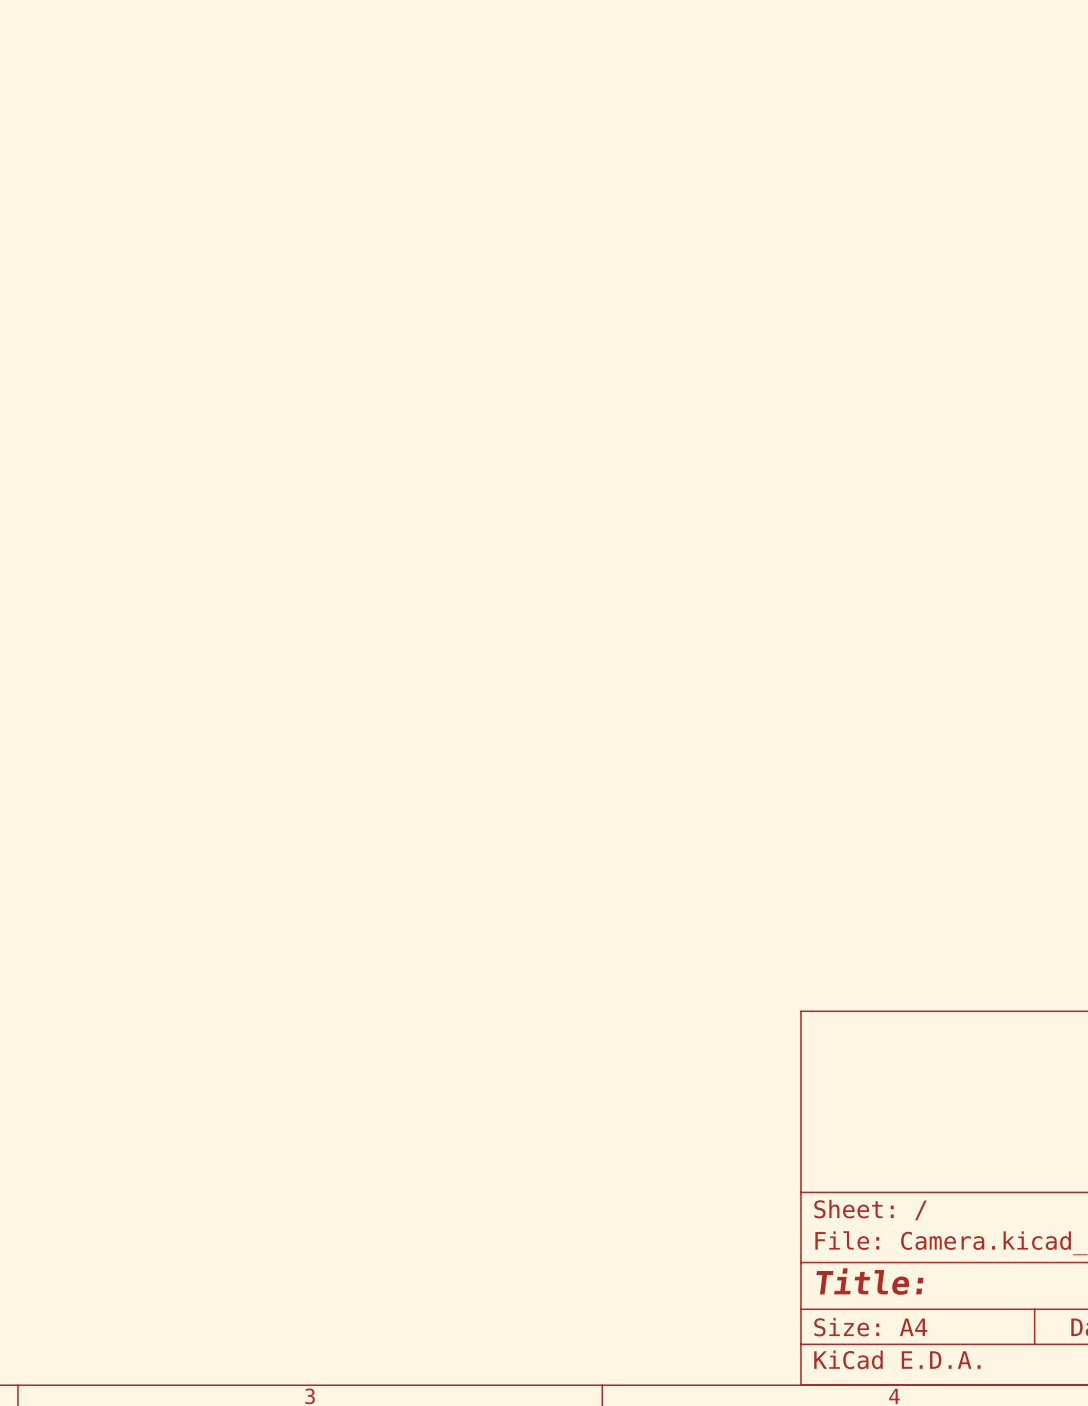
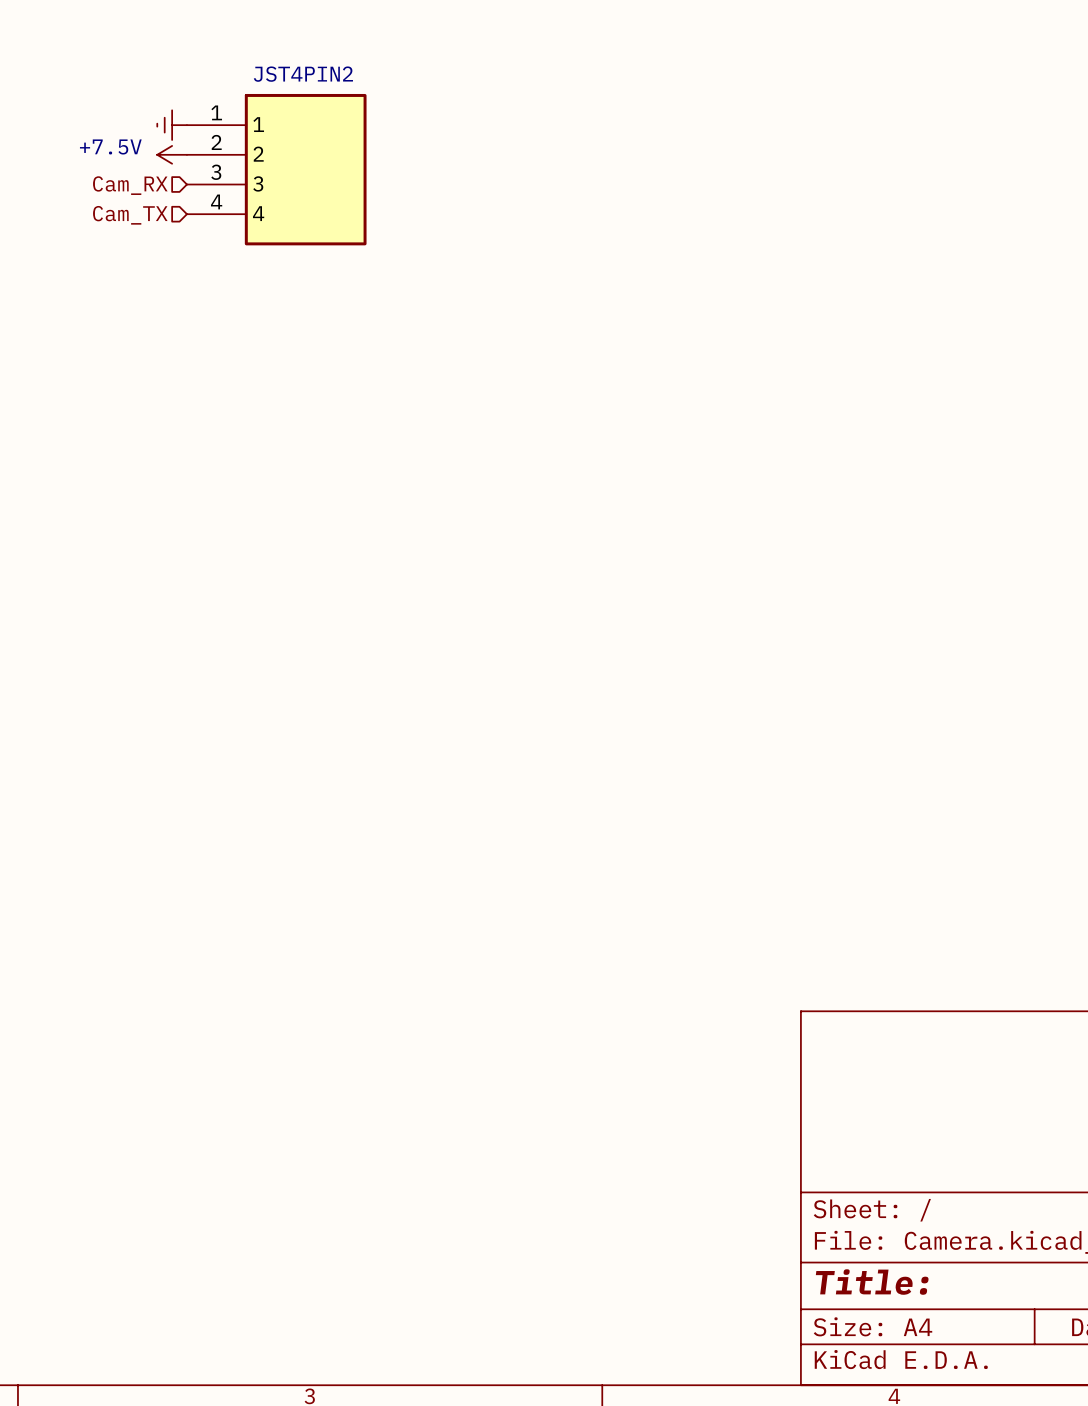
power symbol: none -> (172, 125)
power symbol: none -> +7.5V (172, 154)
JST4PIN2: none -> (276, 169)
hierarchical label: none -> Cam_RX (130, 185)
hierarchical label: none -> Cam_TX (130, 215)

